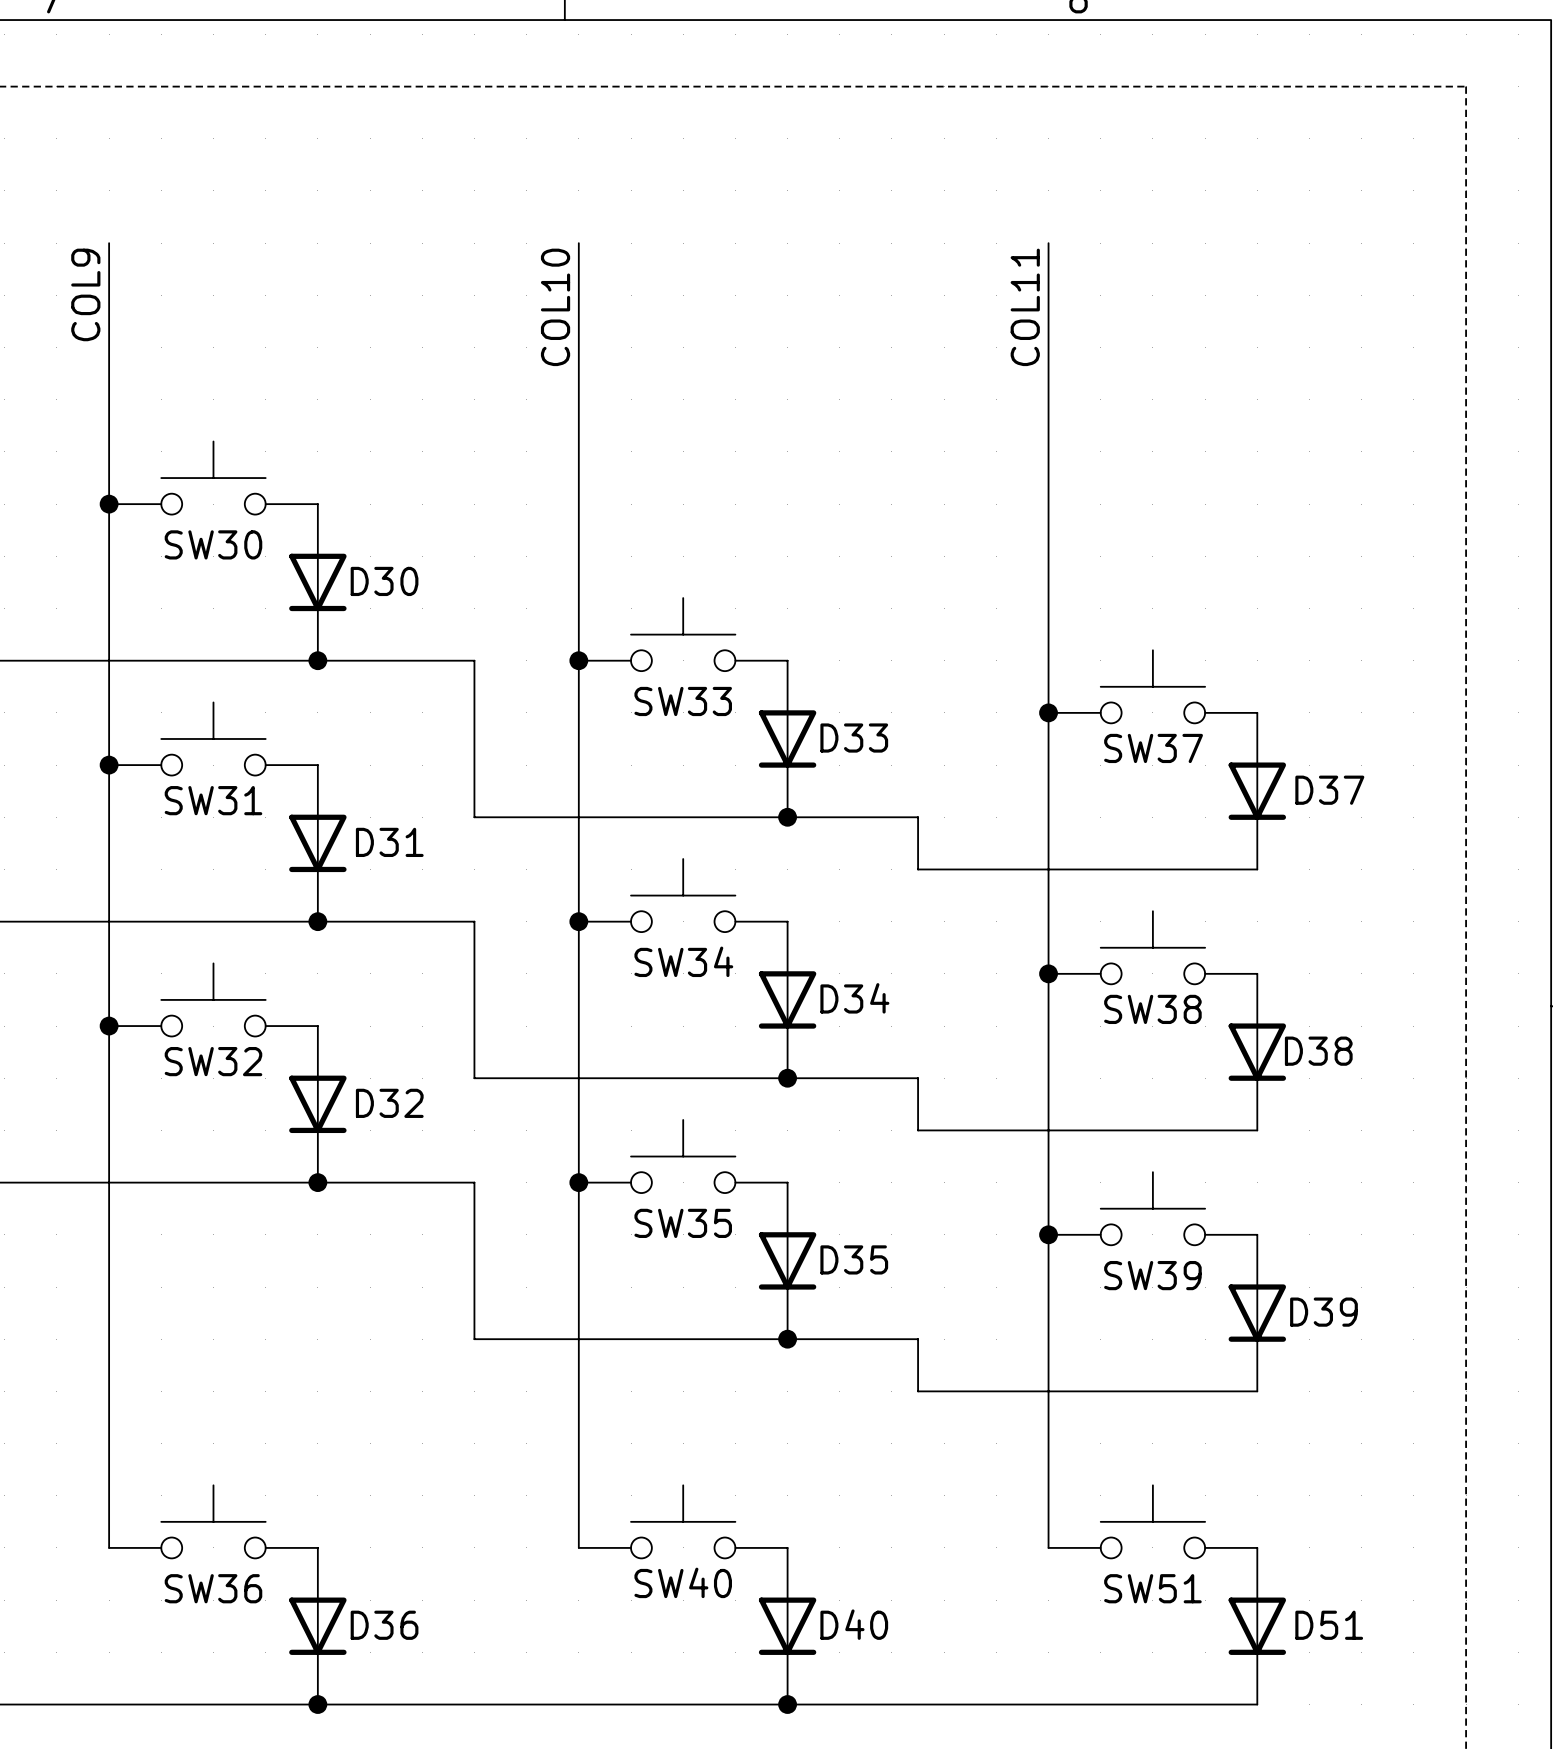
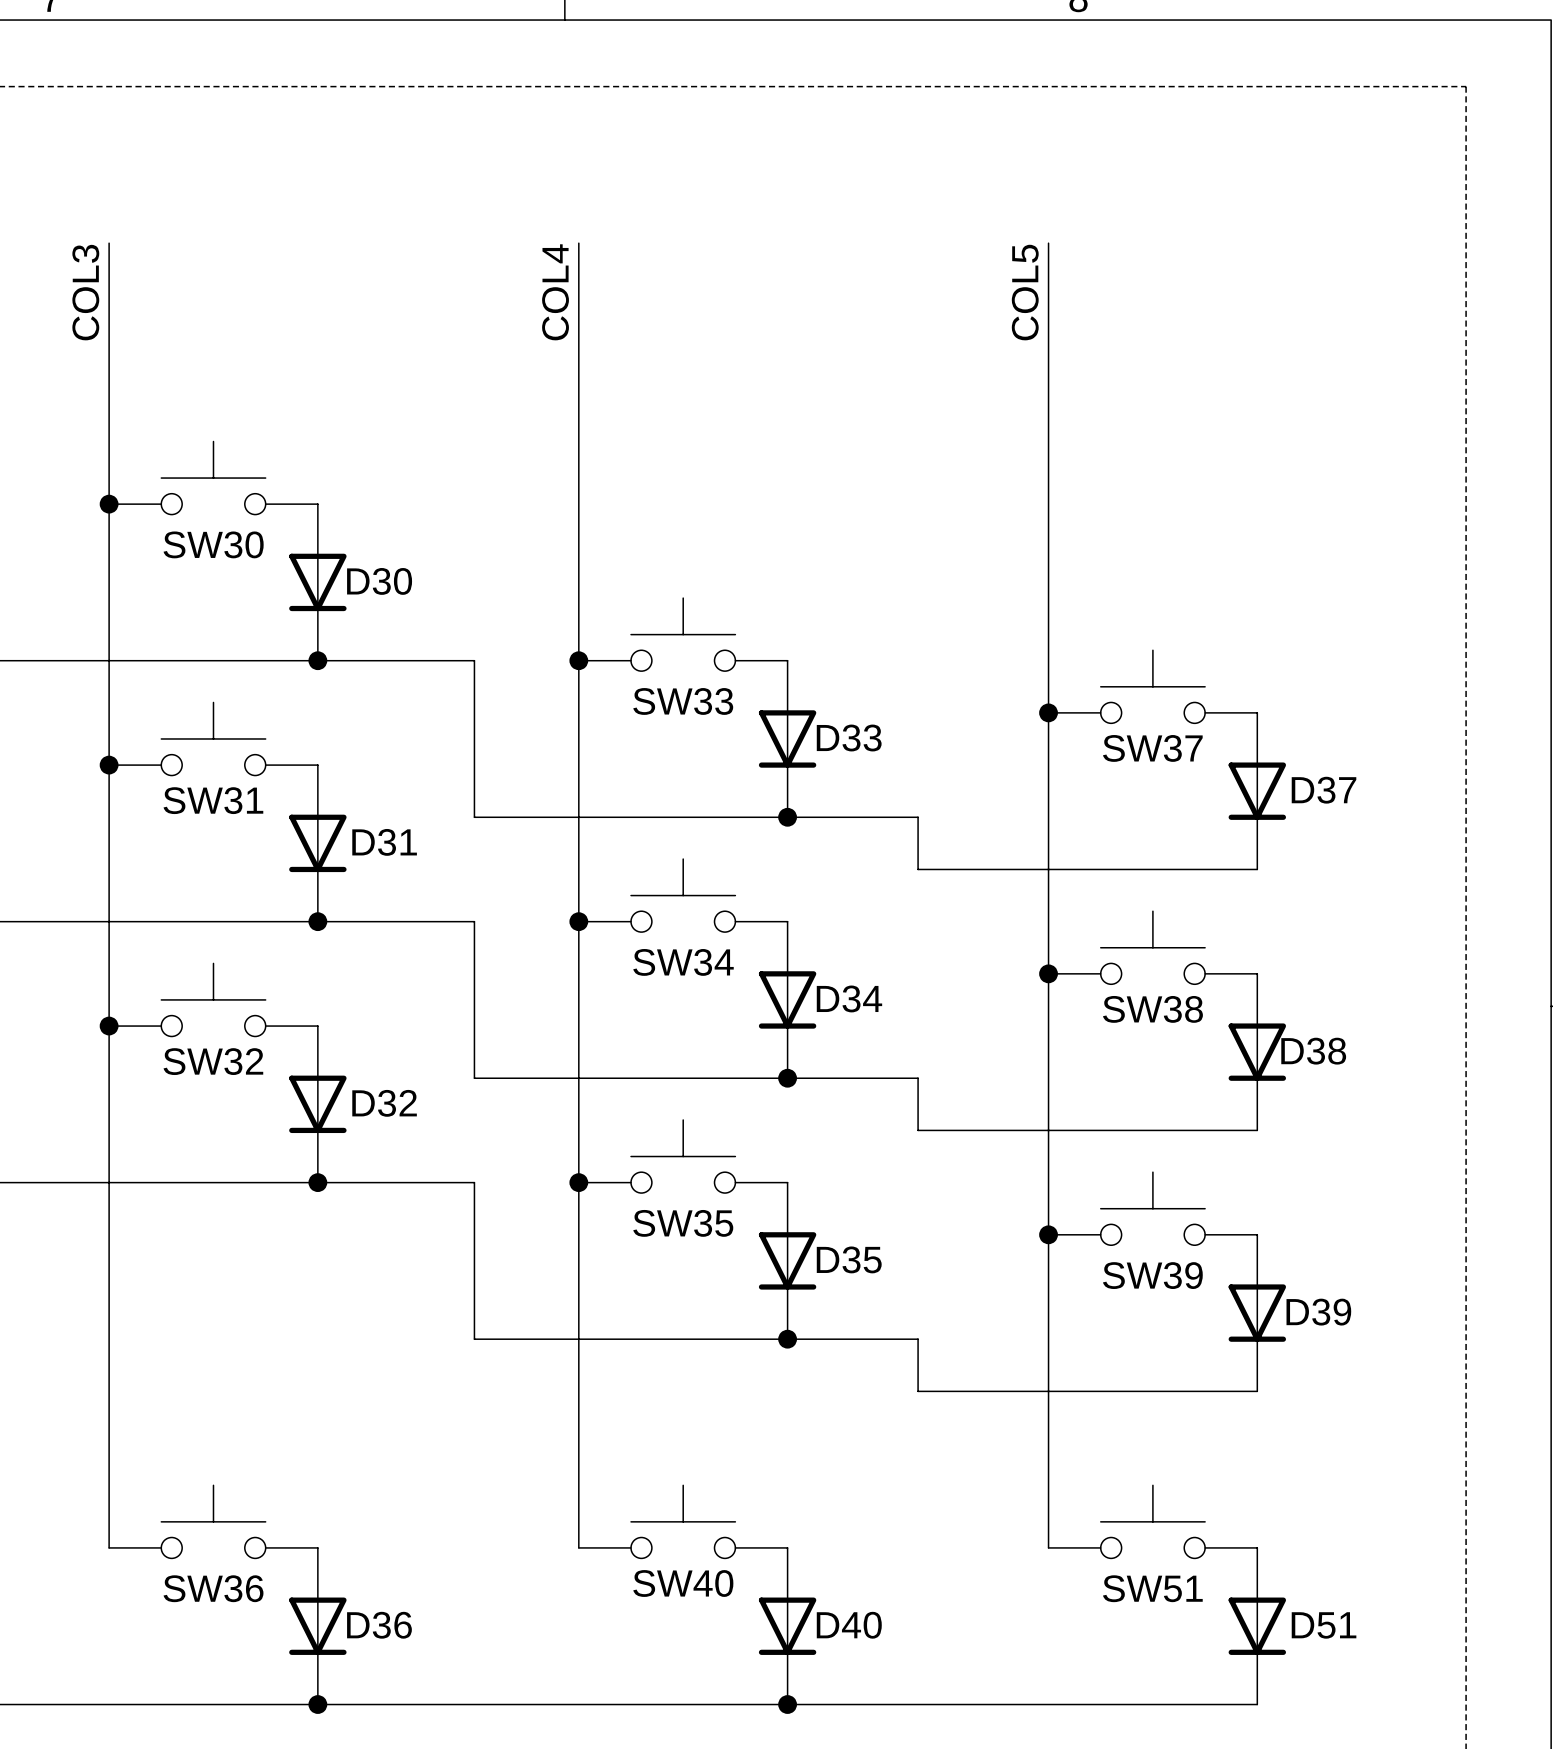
label: COL9 (85, 294) -> COL3 (85, 292)
label: COL10 (555, 307) -> COL4 (555, 292)
label: COL11 (1025, 307) -> COL5 (1025, 292)

